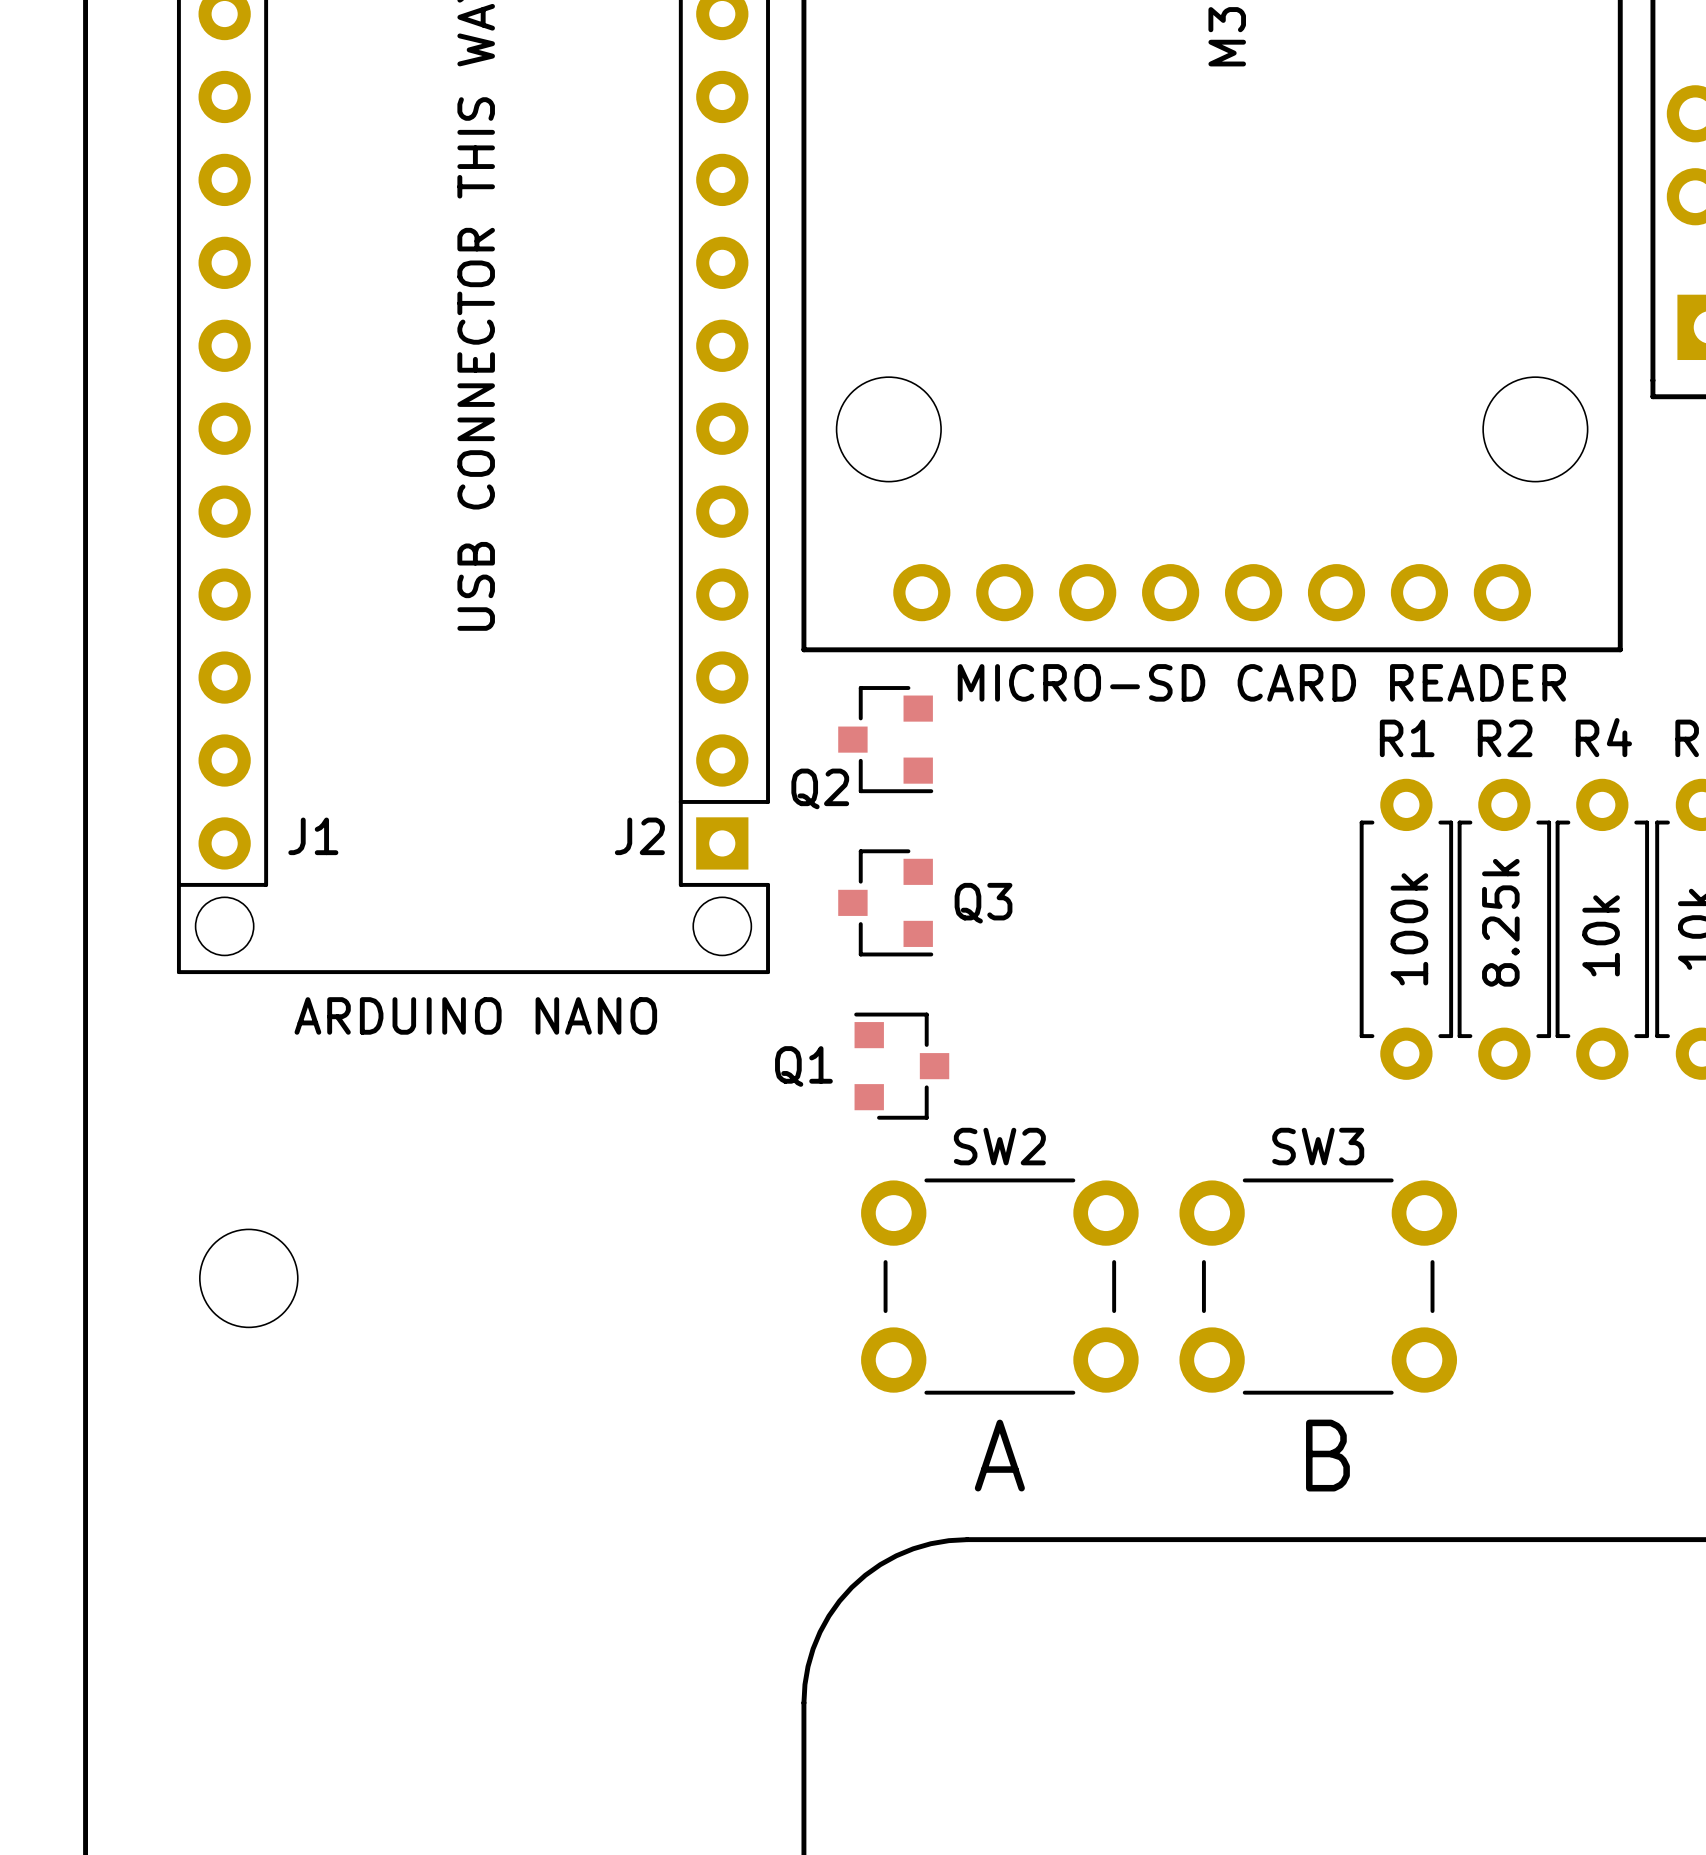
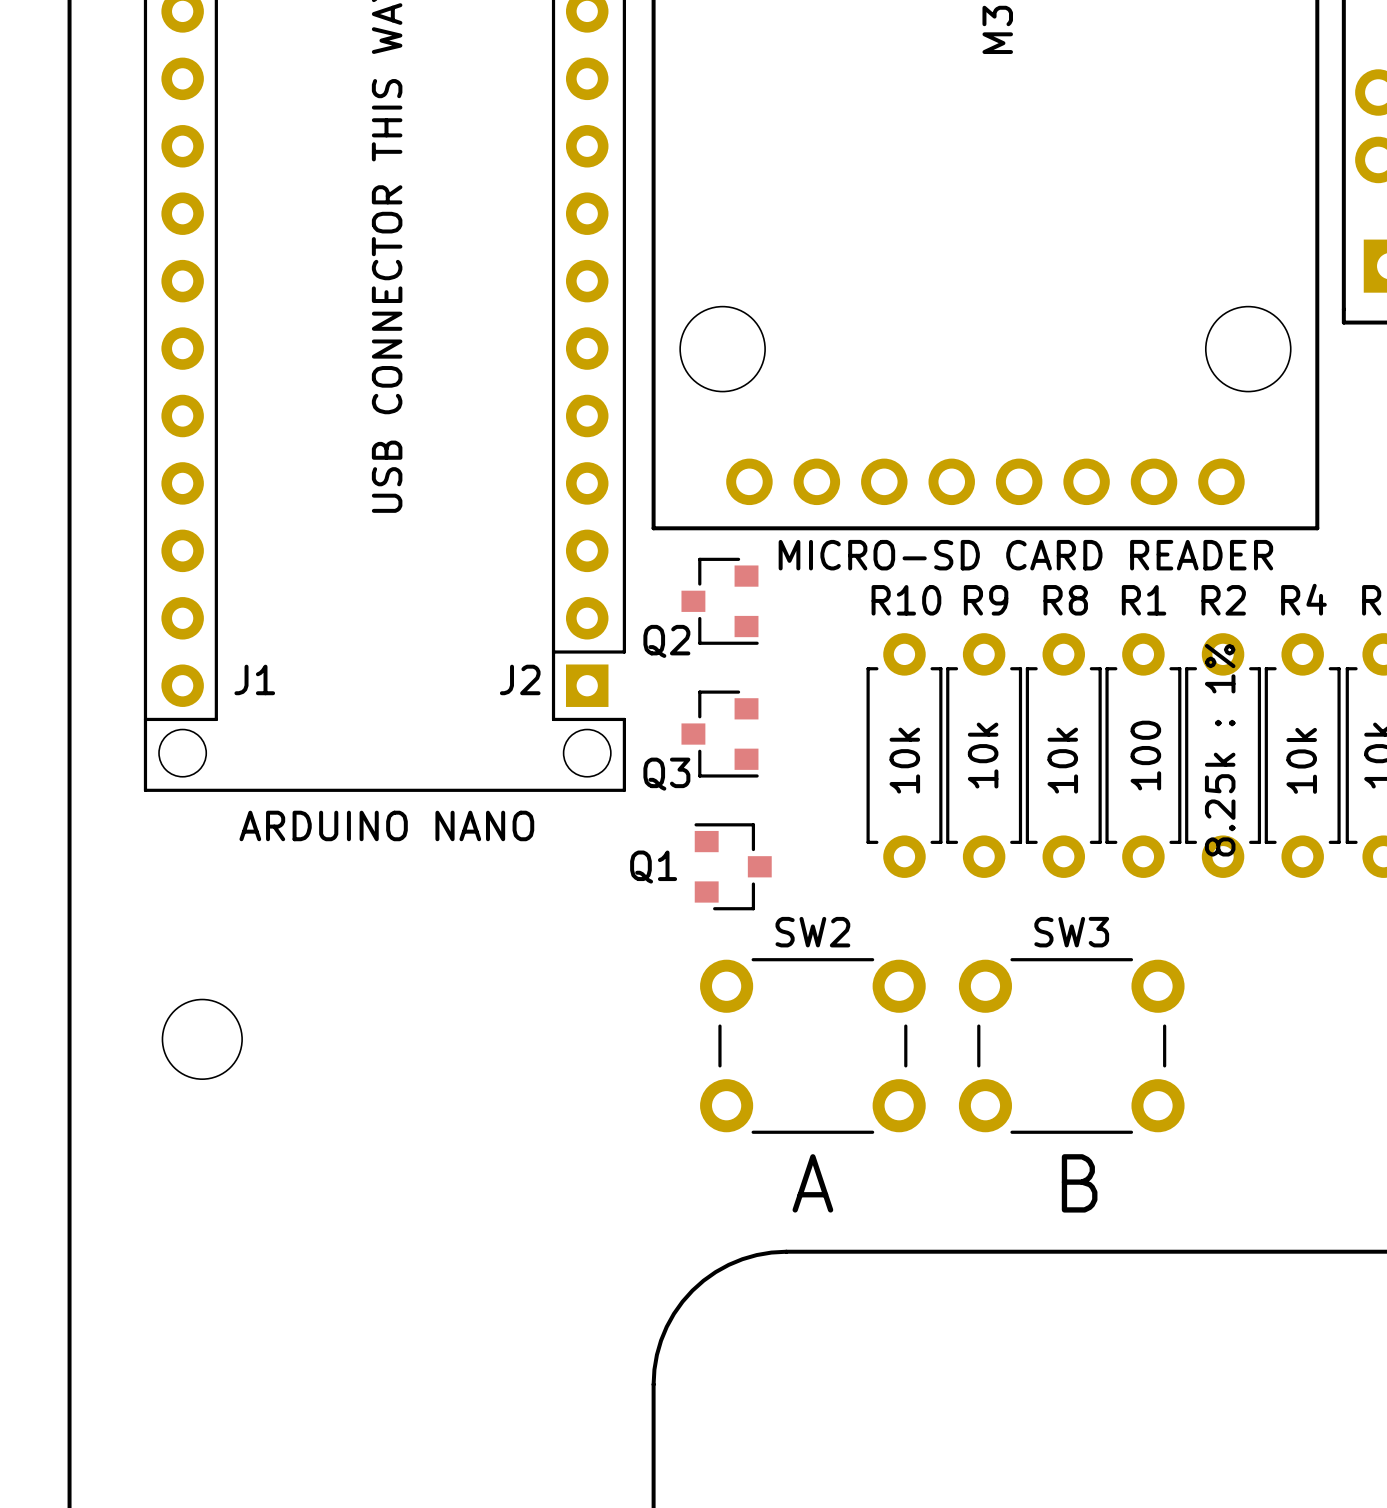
Q3 name position: Q3 (983, 903) -> Q3 (666, 774)
R2 value: 8.25k (1500, 922) -> 8.25k : 1% (1220, 750)
R10: none -> 10k (904, 755)
R9: none -> 10k (984, 755)
R8: none -> 10k (1063, 755)
R1 value: 100k (1409, 929) -> 100 (1145, 755)

